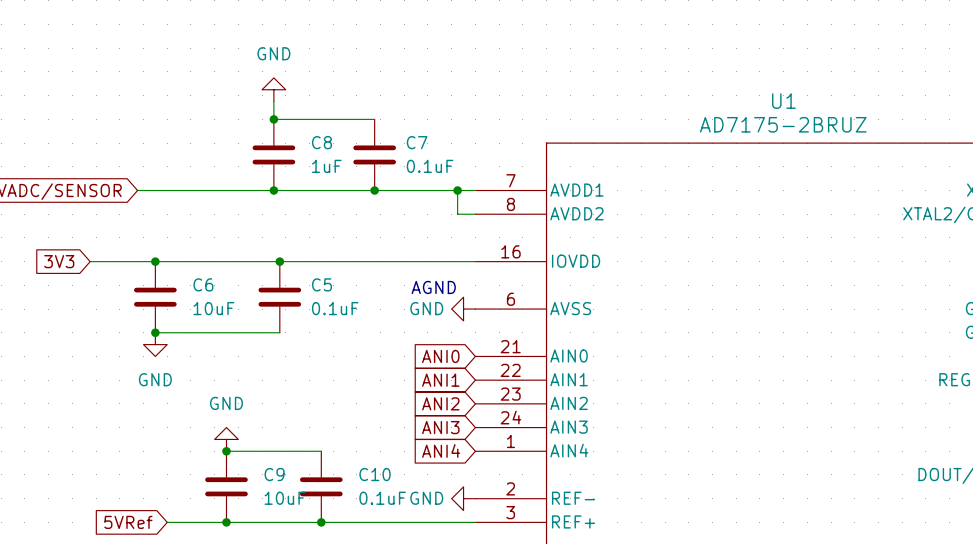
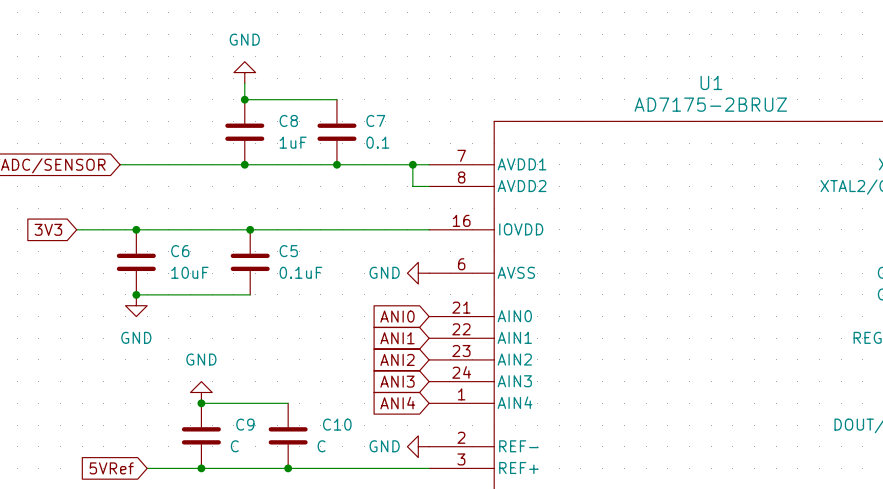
C7 value: 0.1uF (430, 166) -> 0.1 (377, 142)
text: AGND (433, 287) -> none
C9 value: 10uF (284, 498) -> C (234, 446)
C10 value: 0.1uF (382, 498) -> C (321, 446)

